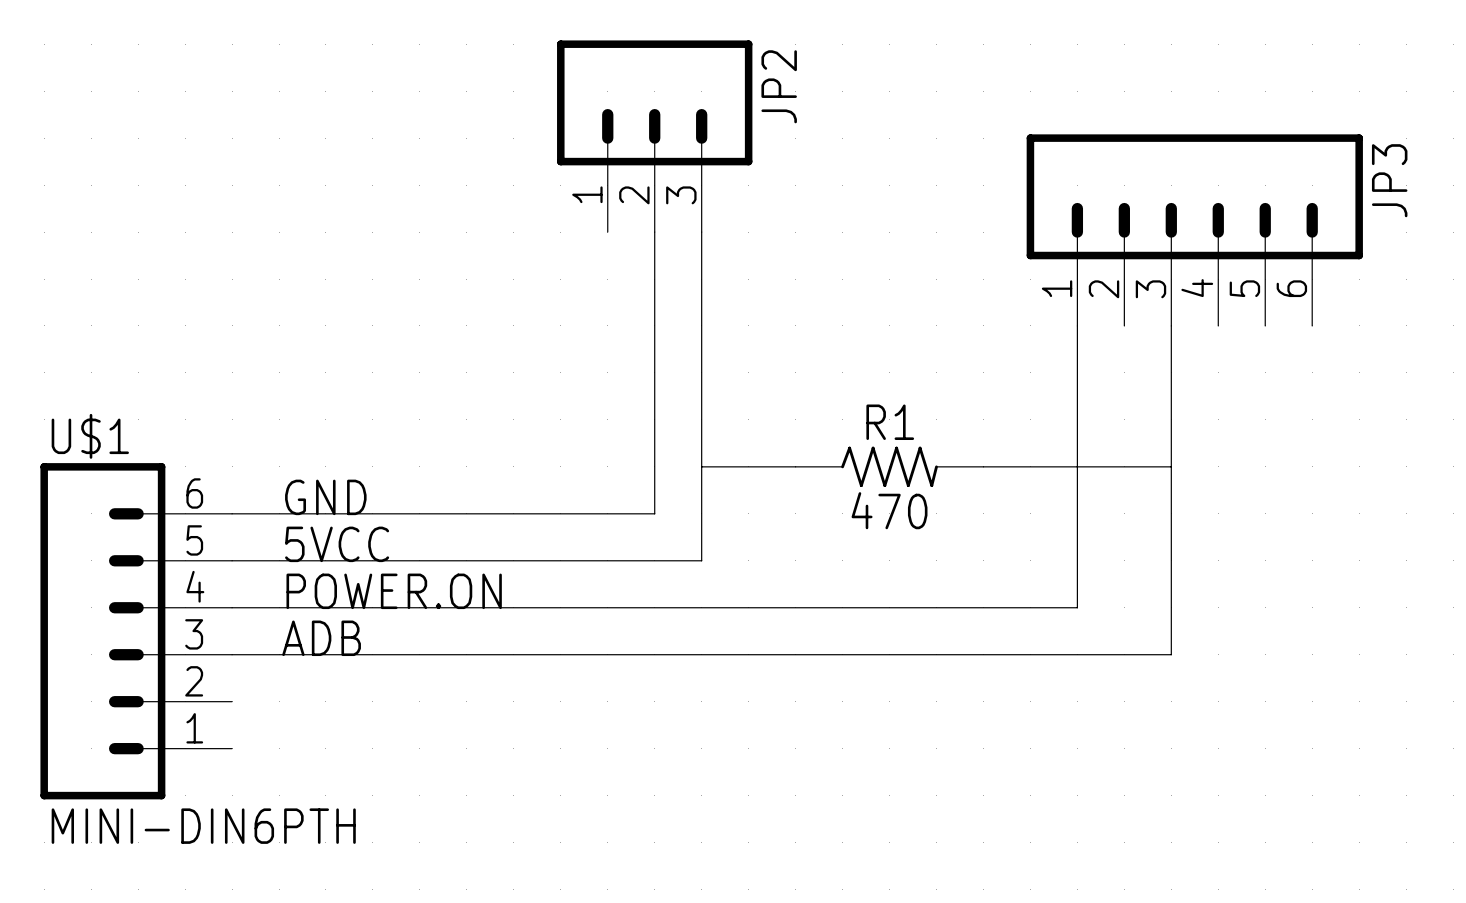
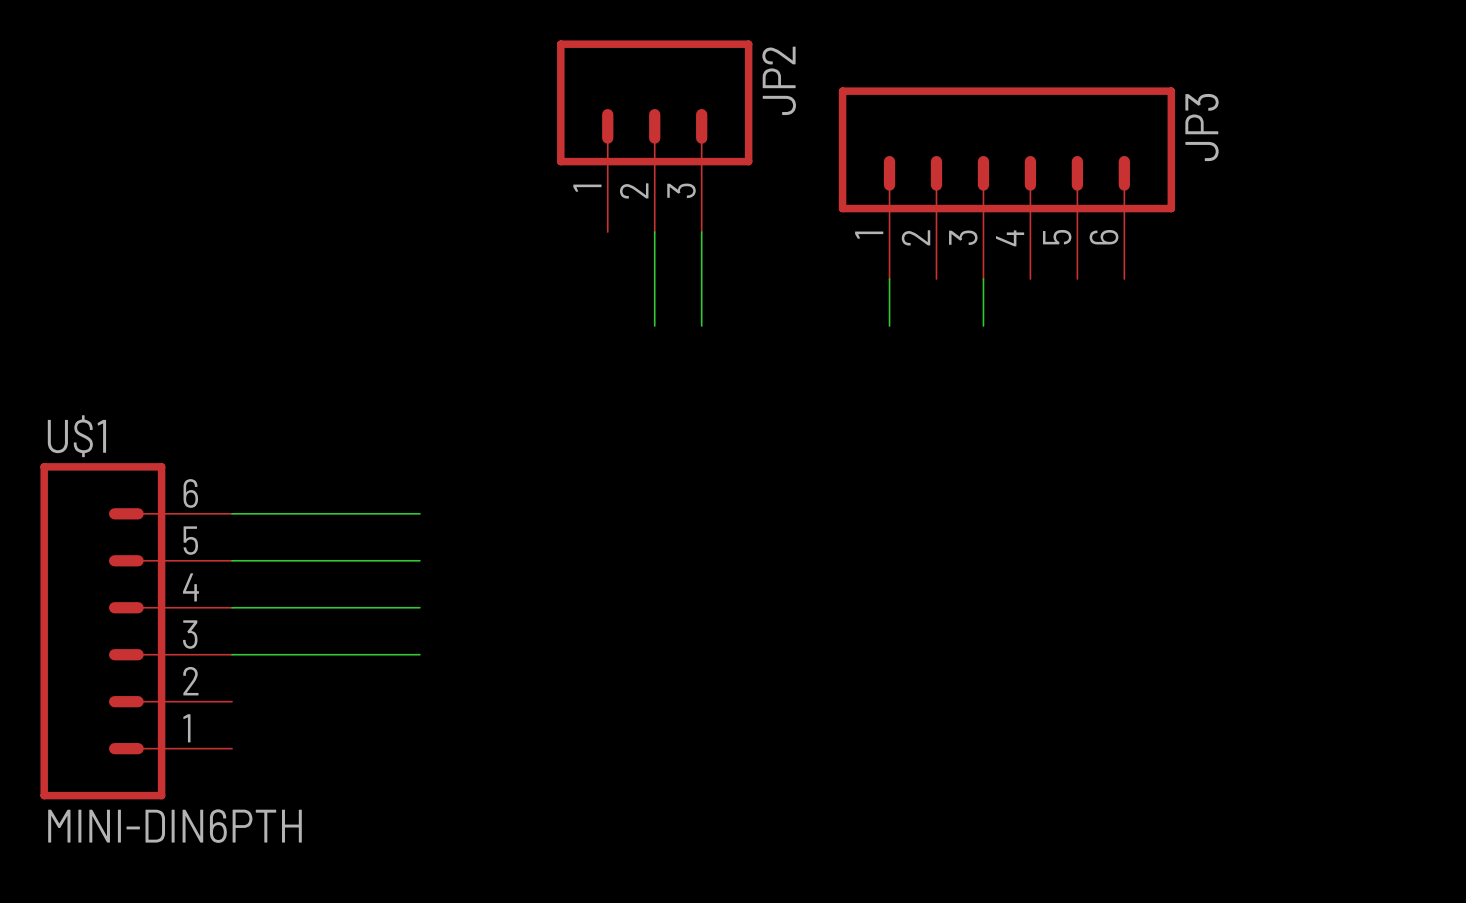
JP3 position: (1194, 230) -> (1006, 183)
wire: none -> (889, 279) (889, 325)
wire: none -> (983, 279) (983, 325)
wire: (654, 325) (654, 513) (419, 513) -> none
wire: (701, 325) (701, 560) (419, 560) -> none
wire: (1077, 325) (1077, 607) (419, 607) -> none
wire: (1171, 325) (1171, 654) (419, 654) -> none
wire: (701, 466) (795, 466) -> none
R1: 470 (889, 466) -> none
wire: (983, 466) (1171, 466) -> none
label: GND (325, 497) -> none
label: 5VCC (337, 544) -> none
label: POWER.ON (394, 591) -> none
label: ADB (321, 638) -> none

